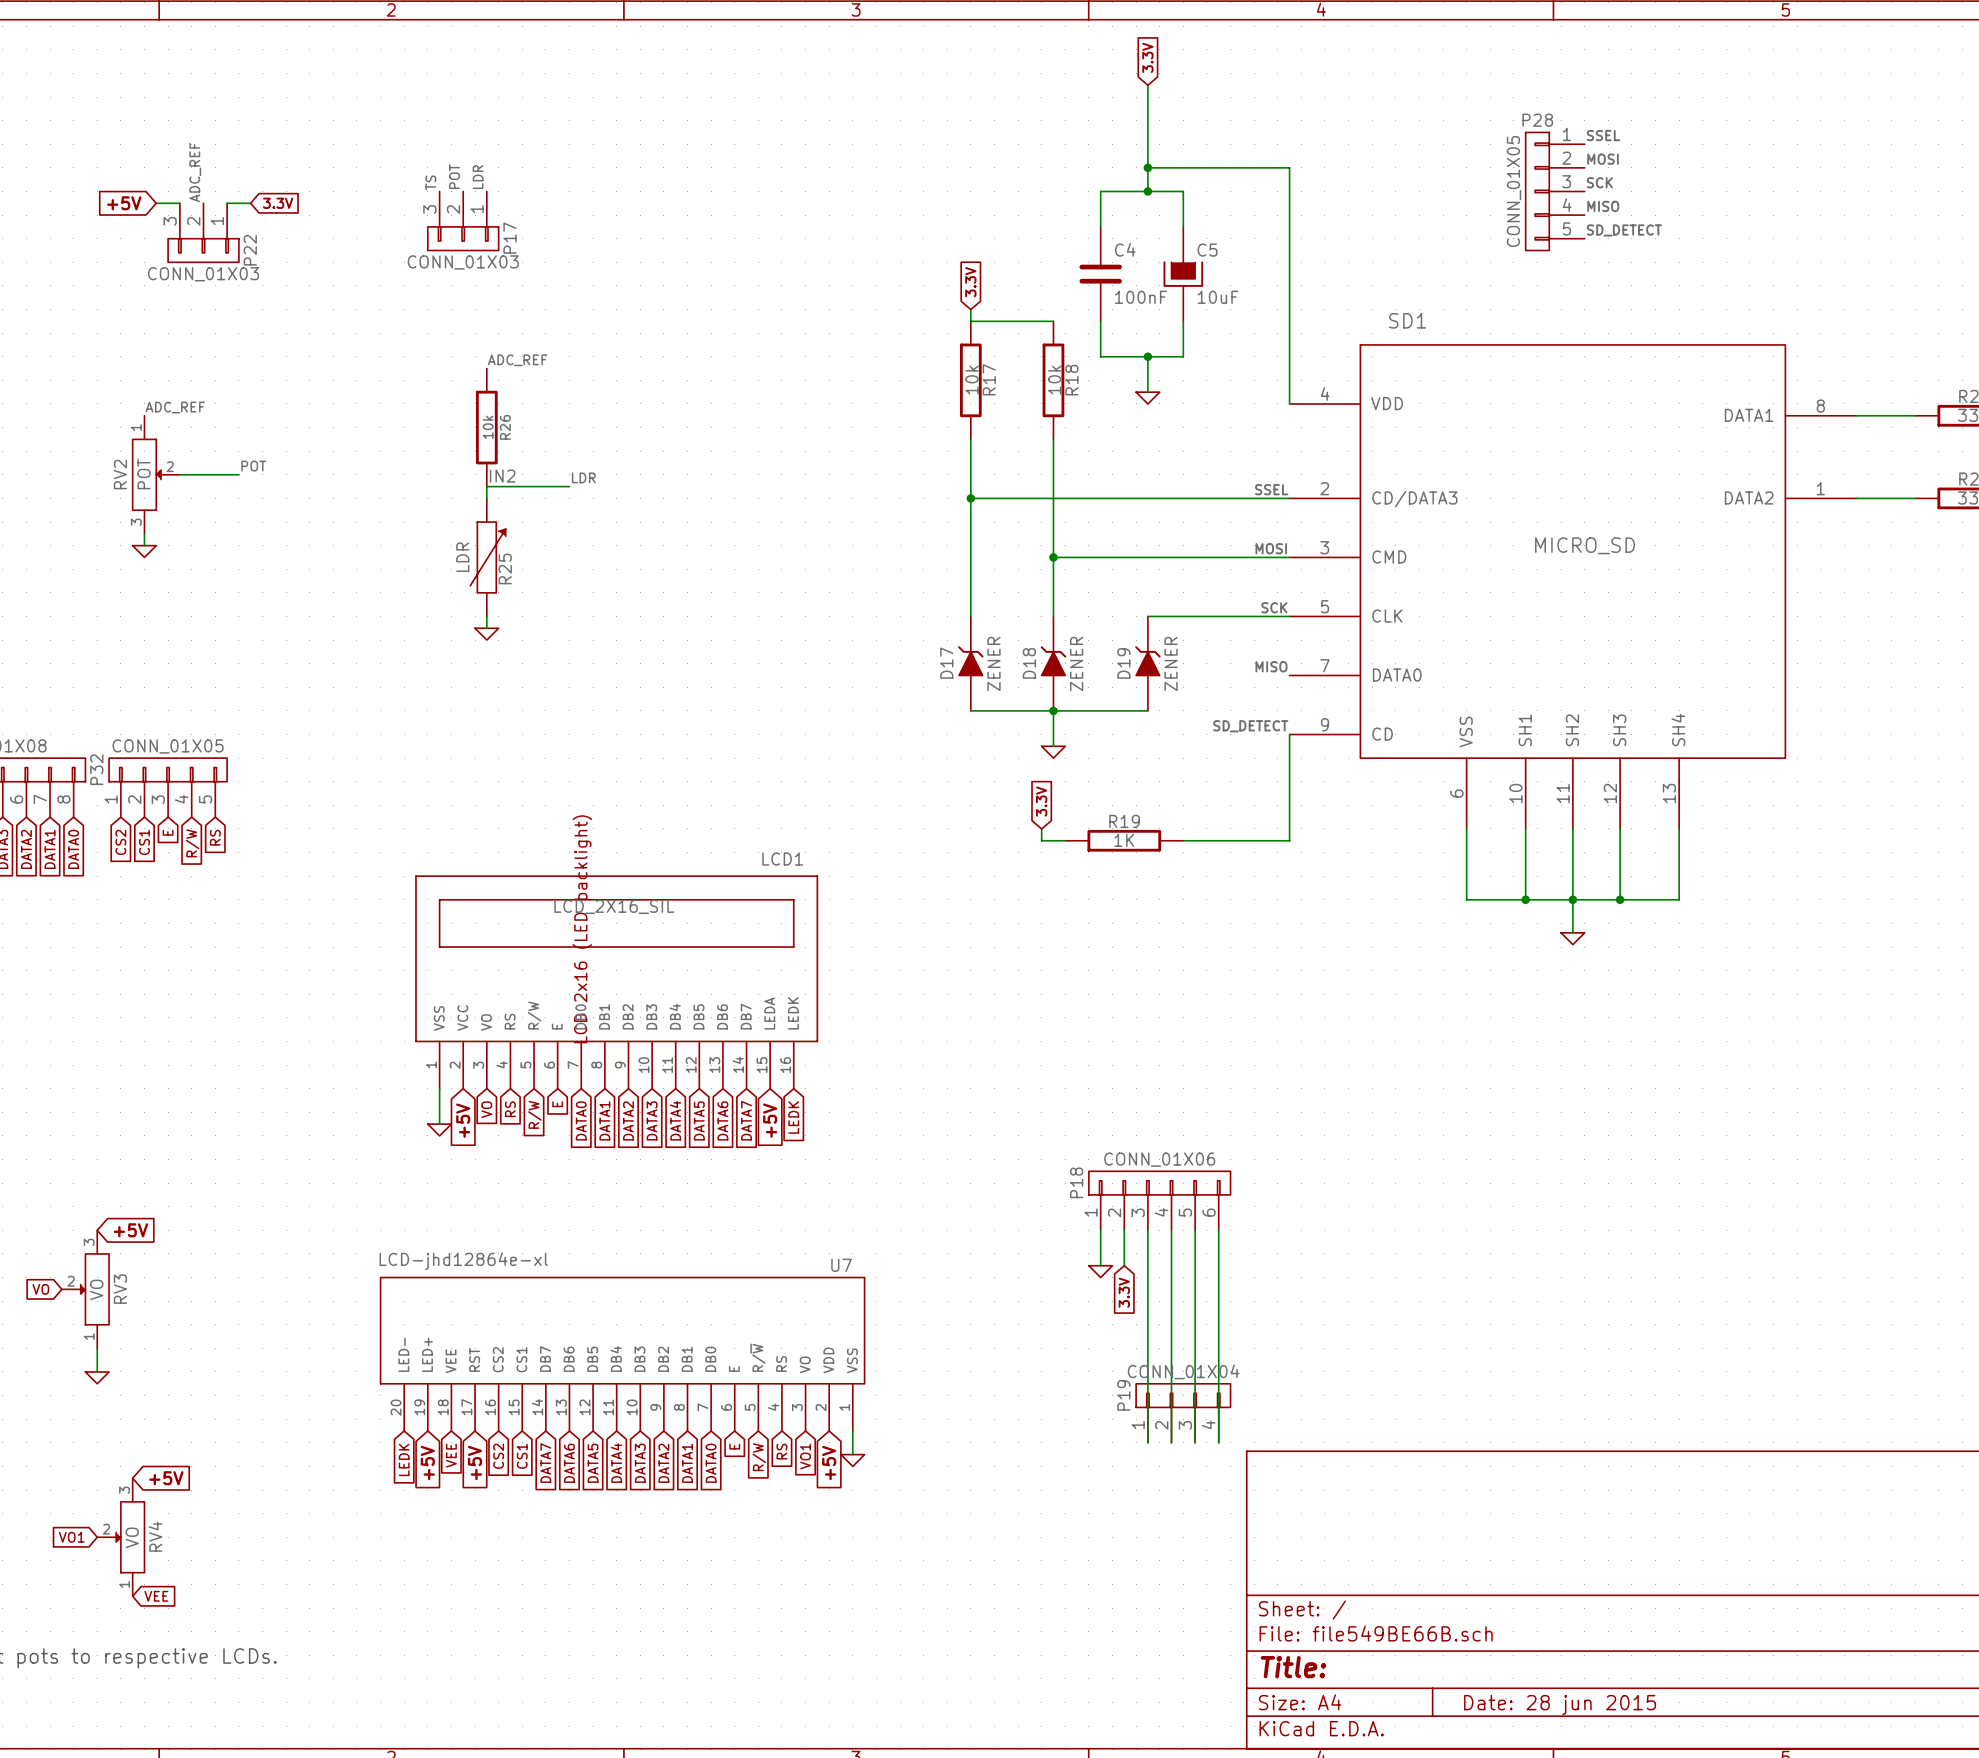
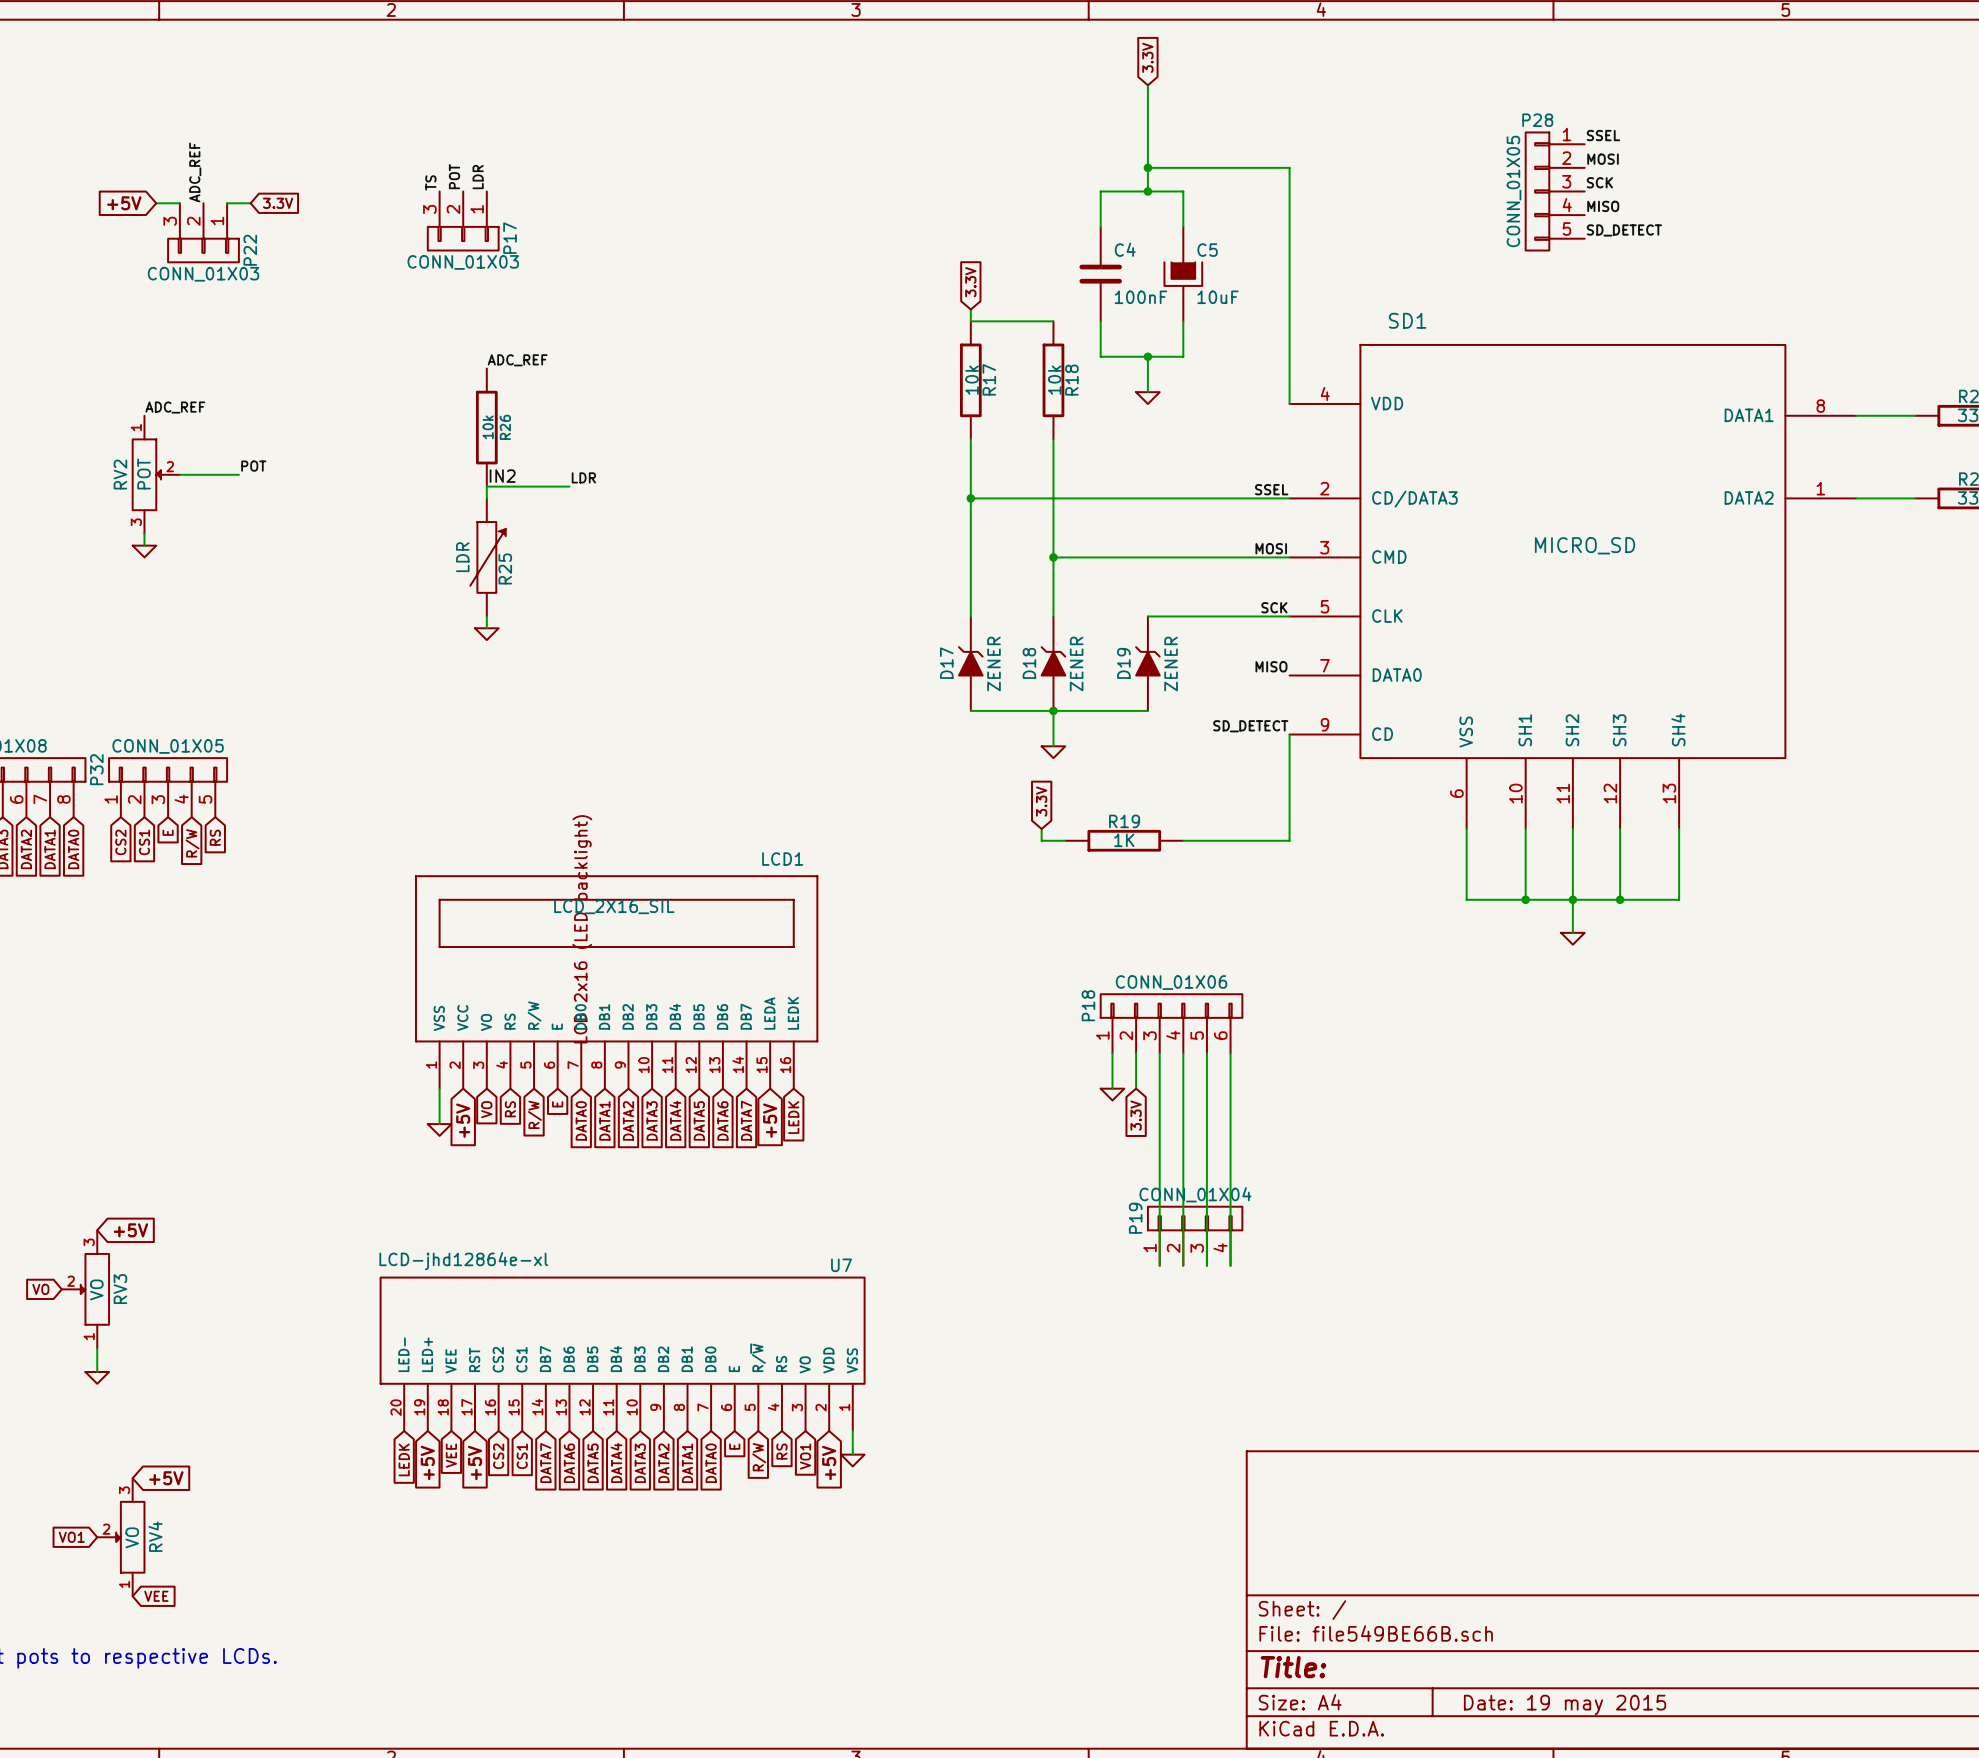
P18 position: (1159, 1200) -> (1171, 1023)
wire: (1100, 1230) (1100, 1265) -> (1112, 1053) (1112, 1088)
wire: (1124, 1230) (1124, 1265) -> (1136, 1053) (1136, 1088)
wire: (1147, 1230) (1147, 1442) -> (1159, 1053) (1159, 1265)
wire: (1171, 1230) (1171, 1442) -> (1183, 1053) (1183, 1265)
wire: (1195, 1230) (1195, 1442) -> (1206, 1053) (1206, 1265)
wire: (1218, 1230) (1218, 1442) -> (1230, 1053) (1230, 1265)
power symbol position: (1100, 1271) -> (1112, 1094)
global label position: 3.3V (1124, 1292) -> 3.3V (1136, 1115)
P19 position: (1183, 1413) -> (1195, 1236)
title block: Date: 28 jun 2015 (1560, 1704) -> Date: 19 may 2015 (1565, 1704)

